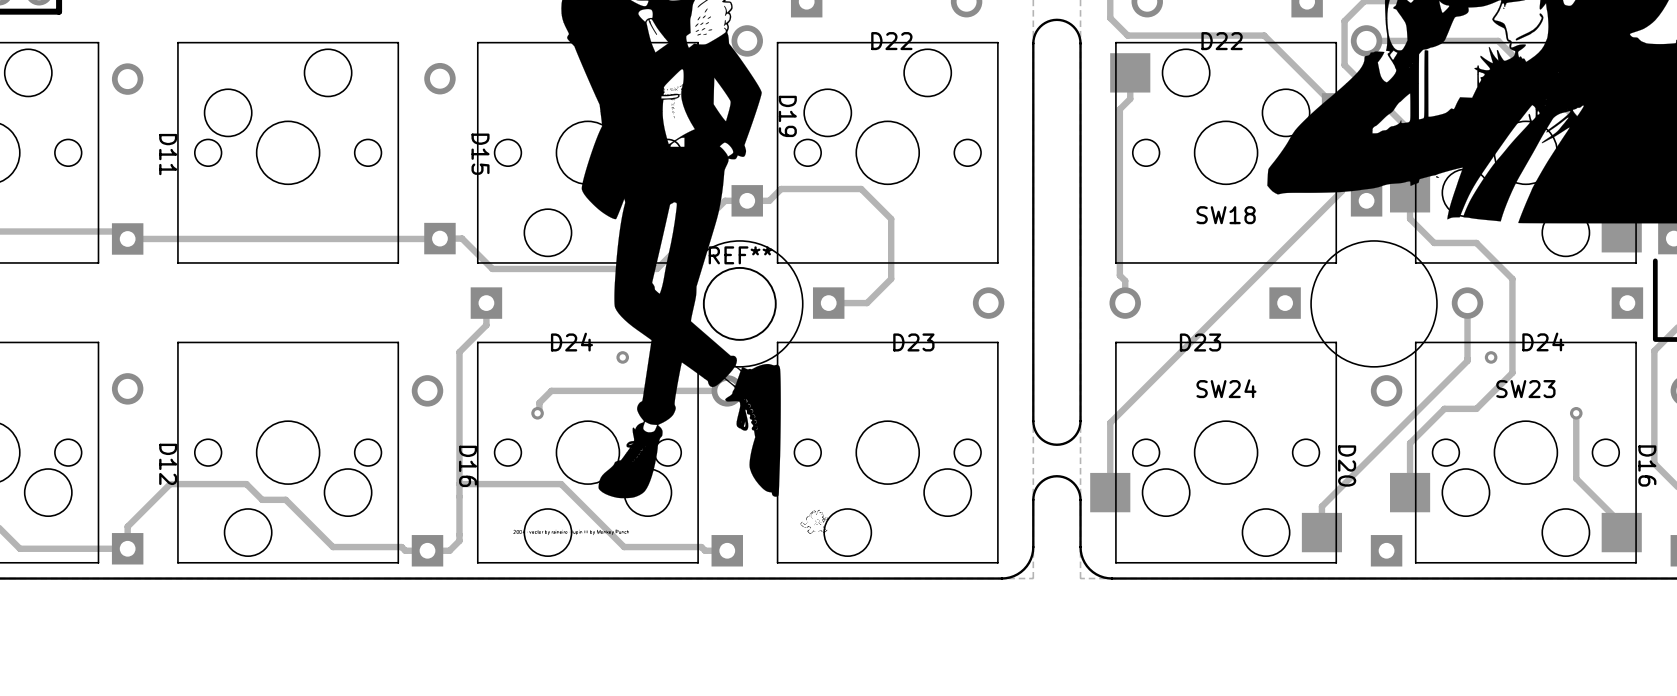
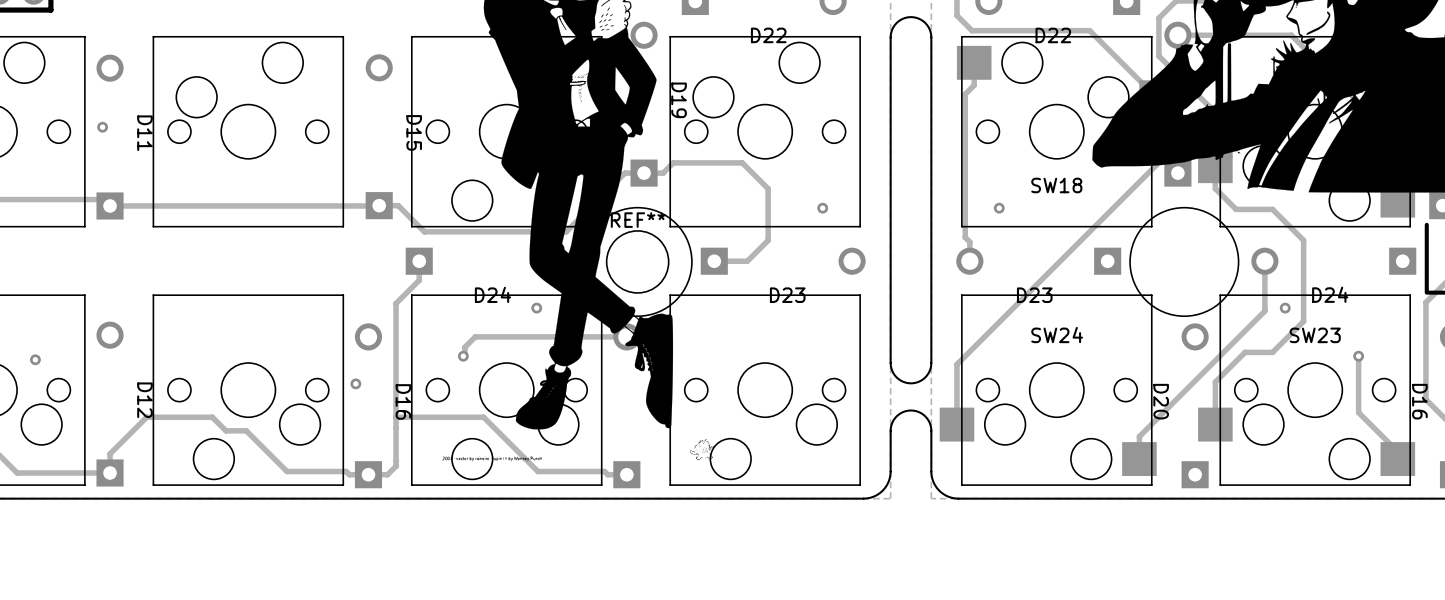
part: none -> (102, 127)
part: none -> (822, 208)
part: none -> (999, 208)
part: none -> (35, 359)
part: none -> (355, 383)

